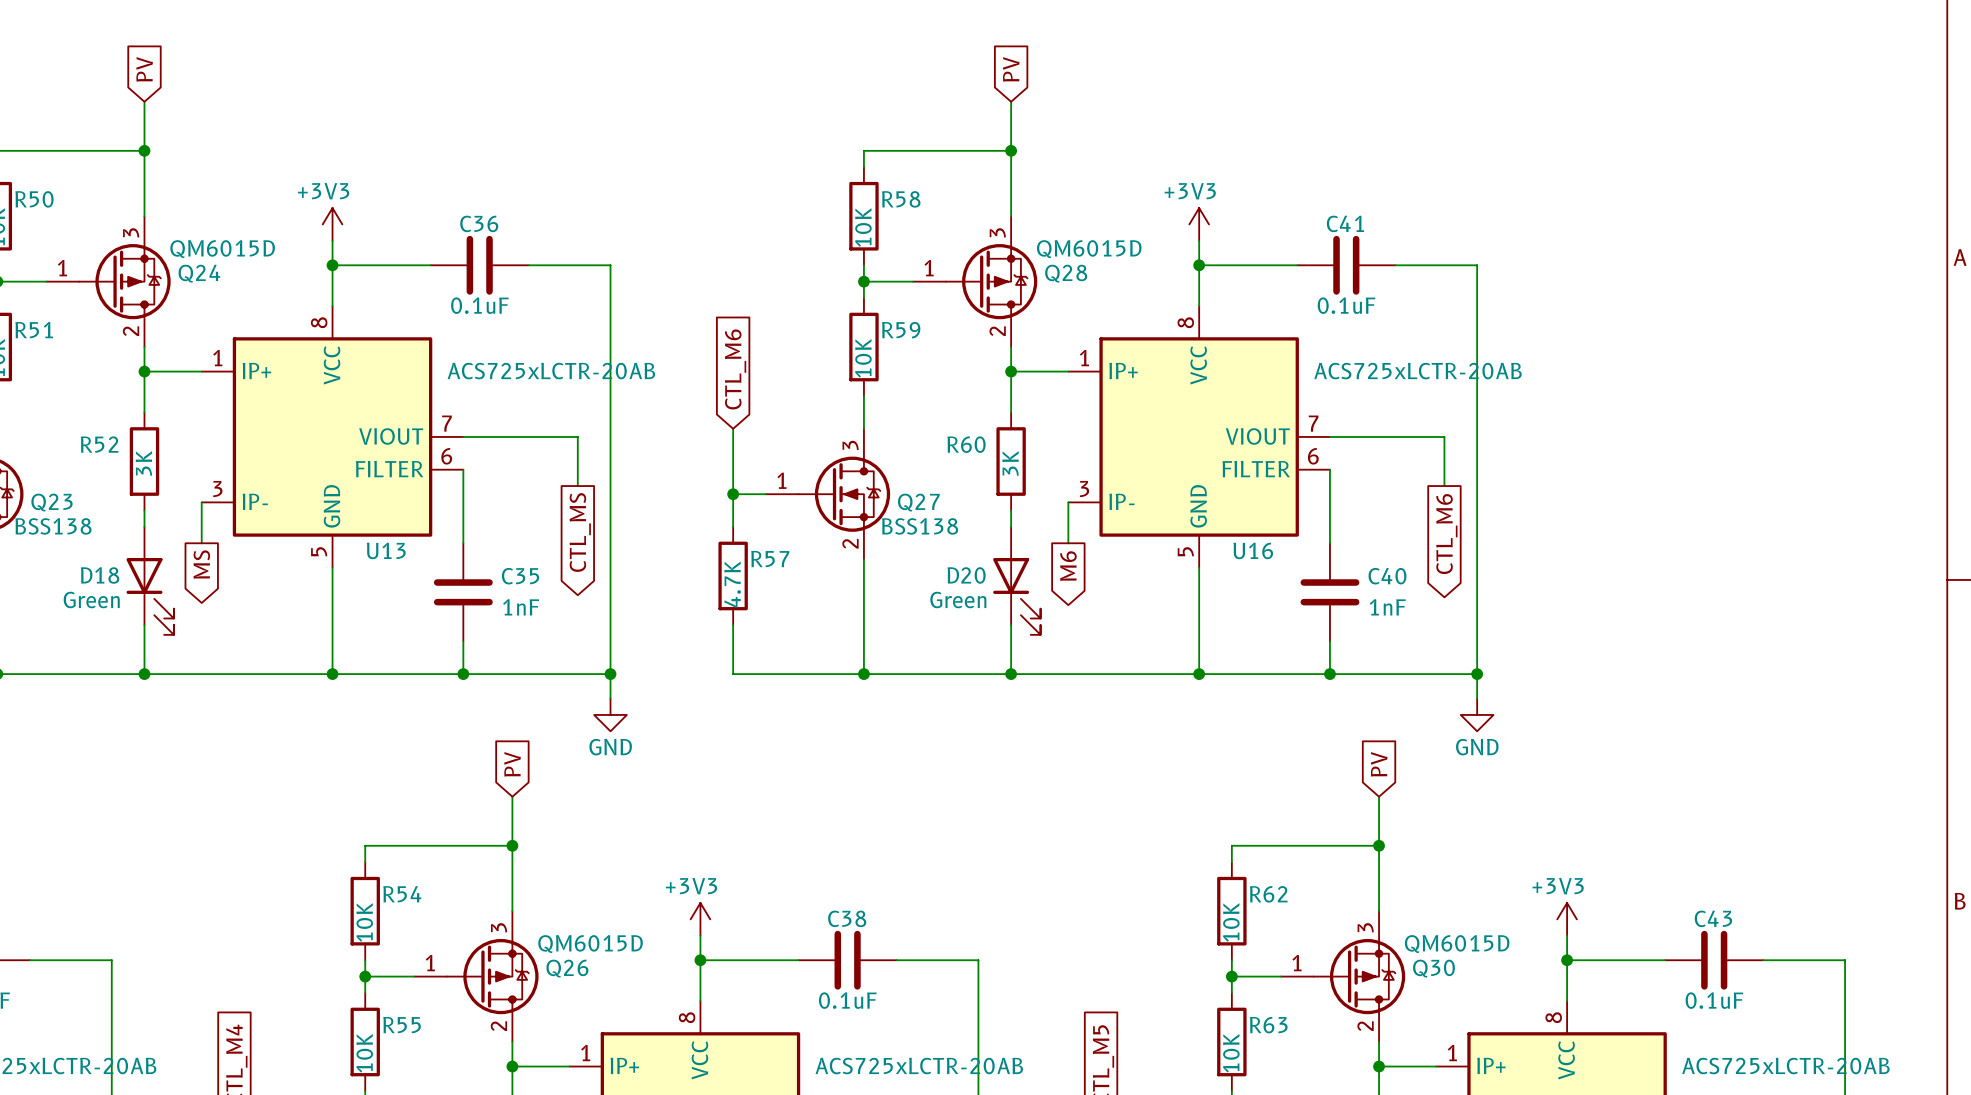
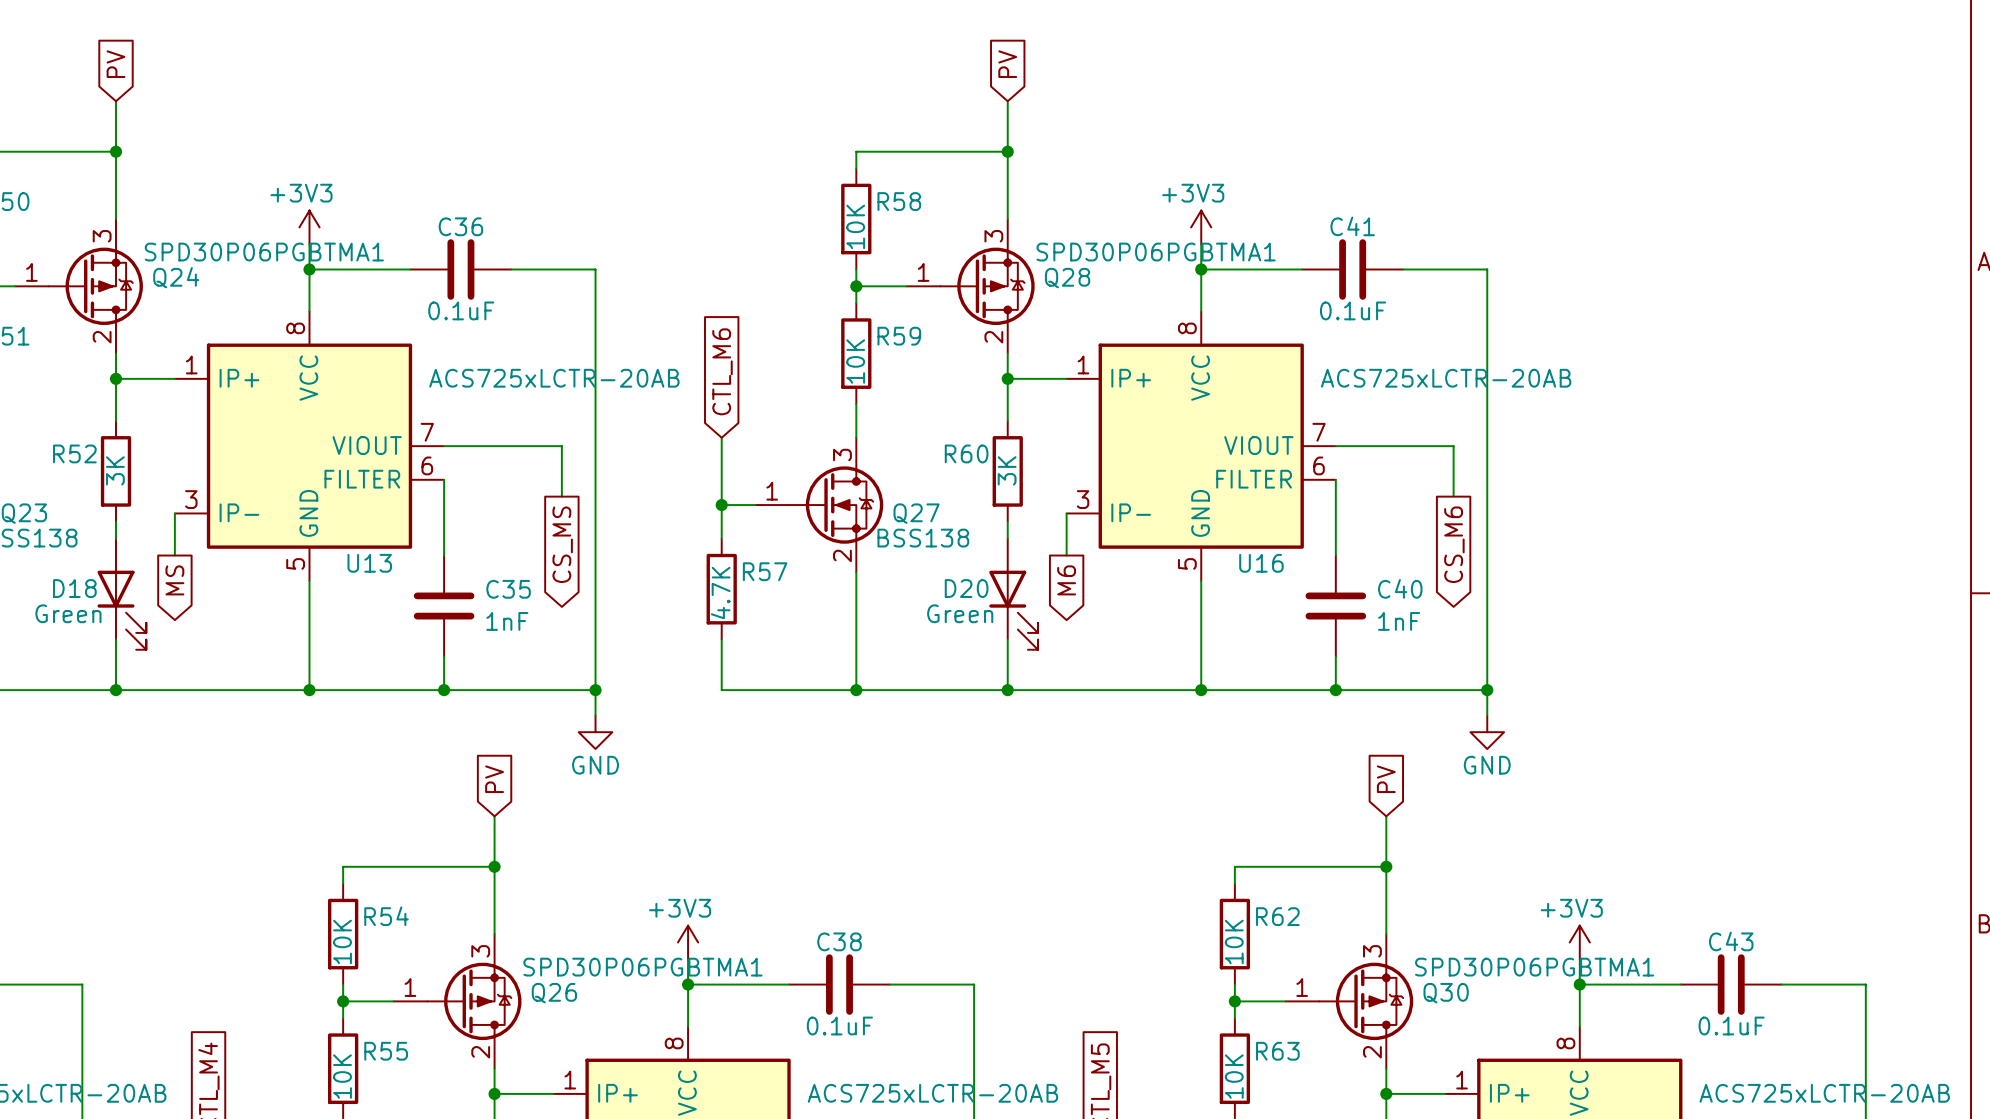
Q24 value: QM6015D (222, 249) -> SPD30P06PGBTMA1 (264, 252)
Q28 value: QM6015D (1089, 249) -> SPD30P06PGBTMA1 (1156, 252)
global label: CTL_MS (580, 532) -> CS_MS (562, 544)
global label: CTL_M6 (1446, 534) -> CS_M6 (1454, 544)
Q26 value: QM6015D (590, 944) -> SPD30P06PGBTMA1 (642, 967)
Q30 value: QM6015D (1457, 944) -> SPD30P06PGBTMA1 (1534, 967)

